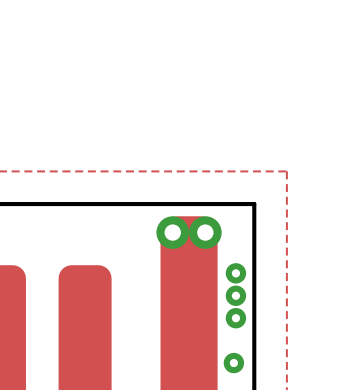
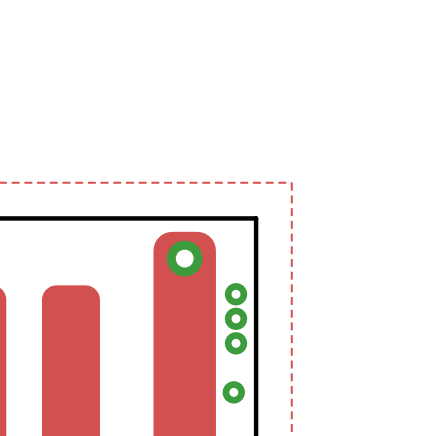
via: (172, 232) -> none
via: (205, 232) -> none
via: none -> (184, 258)

